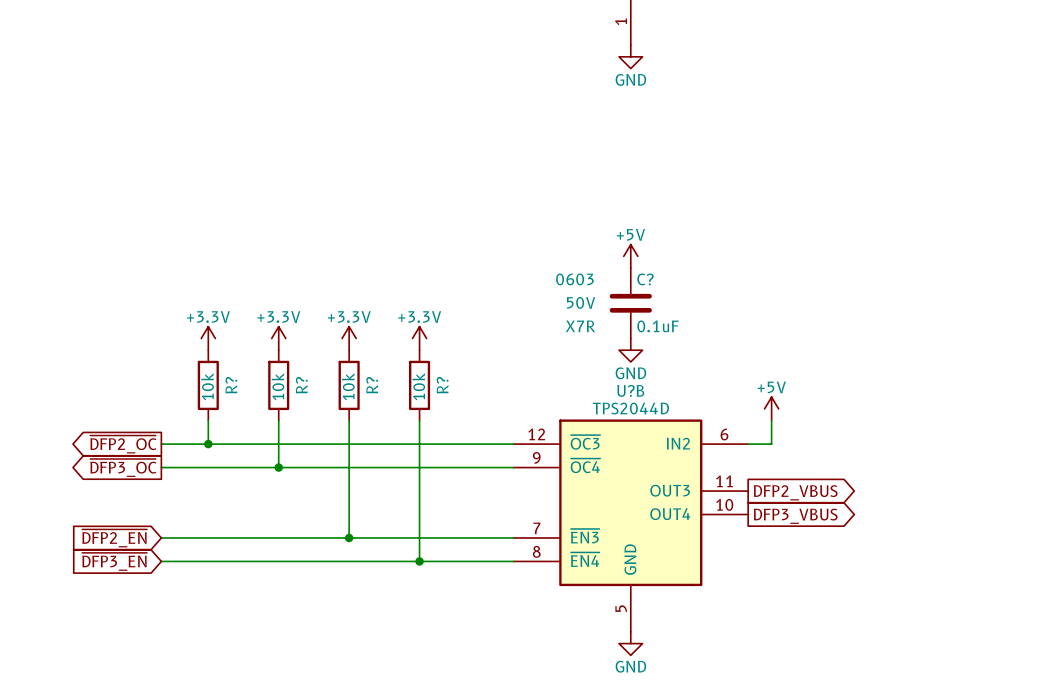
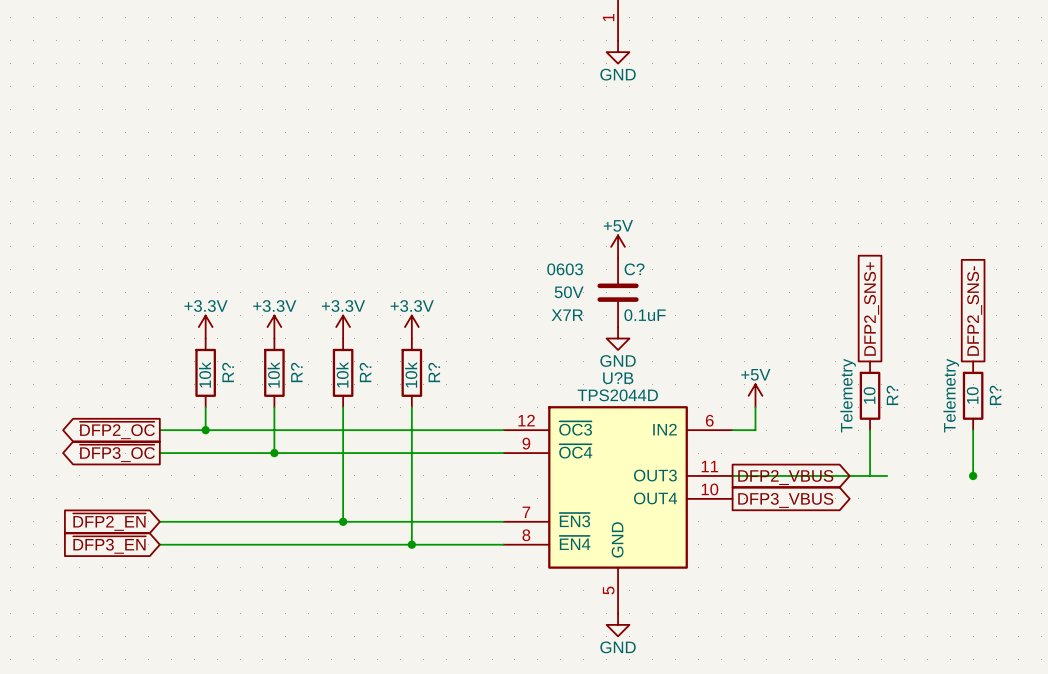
global label: none -> DFP2_SNS+ (871, 308)
global label: none -> DFP2_SNS- (974, 311)
R?: none -> 10 (870, 395)
R?: none -> 10 (973, 395)
wire: none -> (870, 430) (870, 475)
wire: none -> (973, 430) (973, 475)
wire: none -> (732, 475) (887, 475)
junction: none -> (973, 475)

